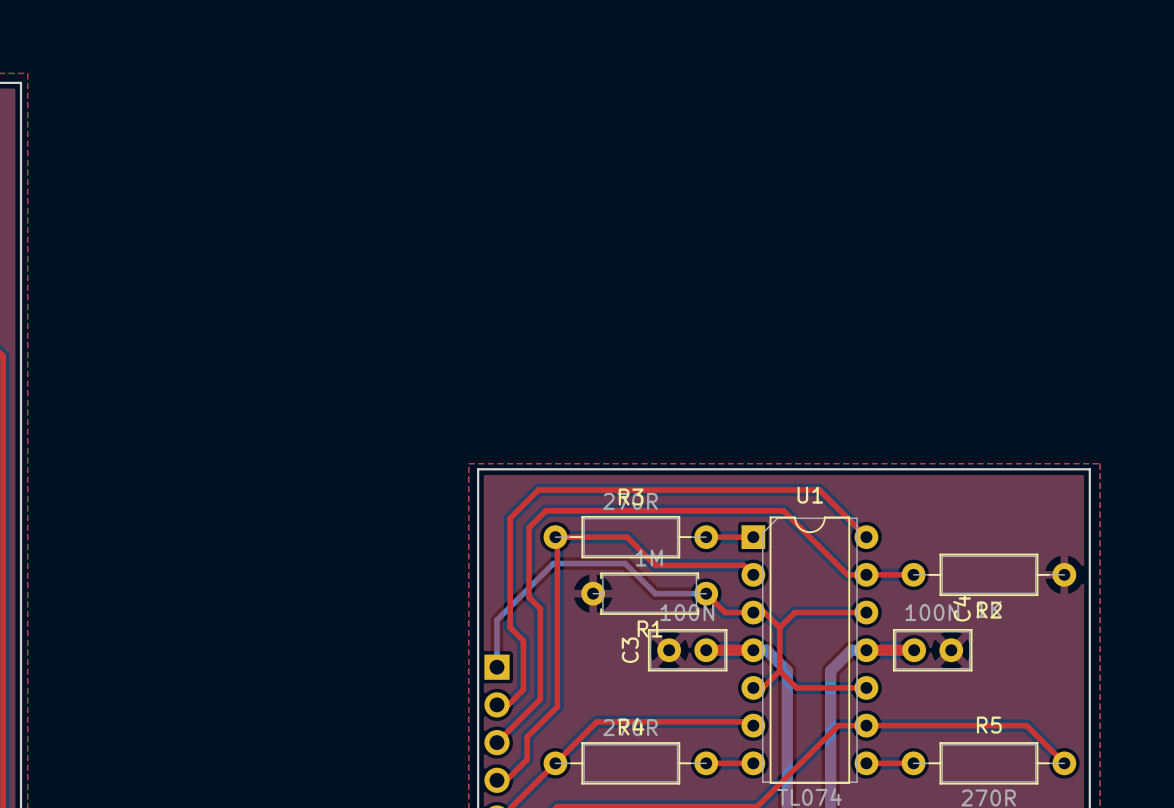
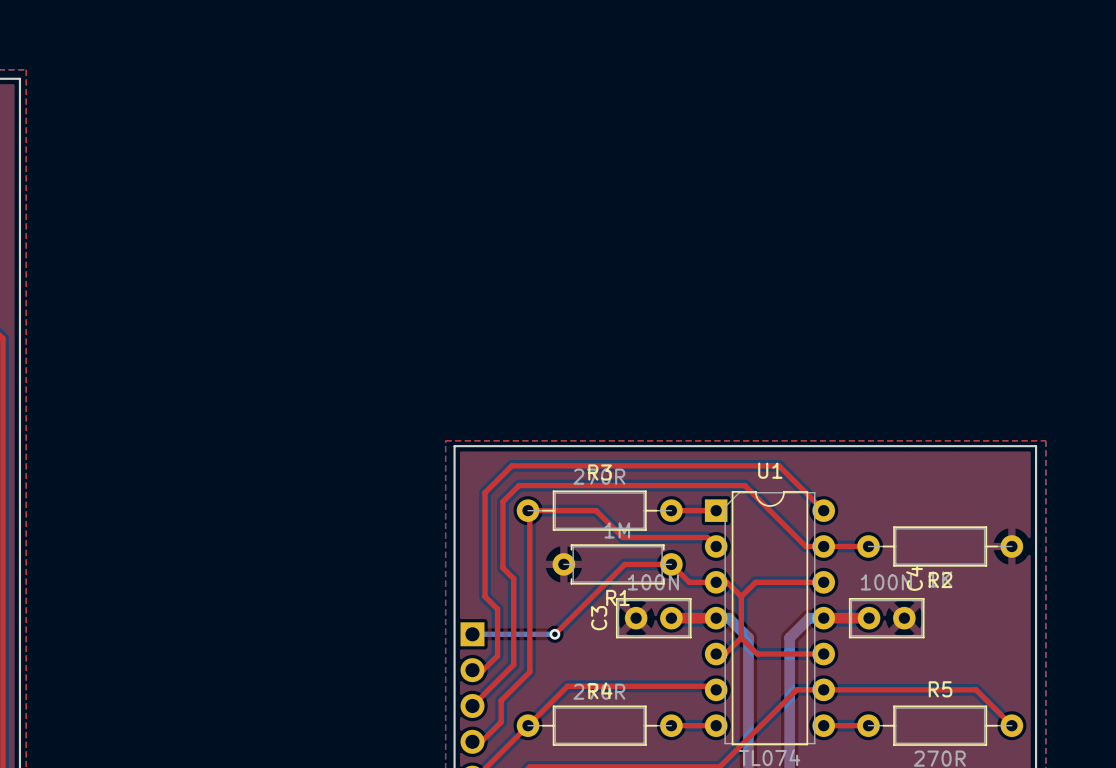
top track: none -> (671, 564) (624, 564) (554, 634)
bottom track: (706, 593) (655, 593) (625, 563) (553, 563) (496, 620) (496, 667) -> (554, 634) (472, 634)
via: none -> (554, 634)

